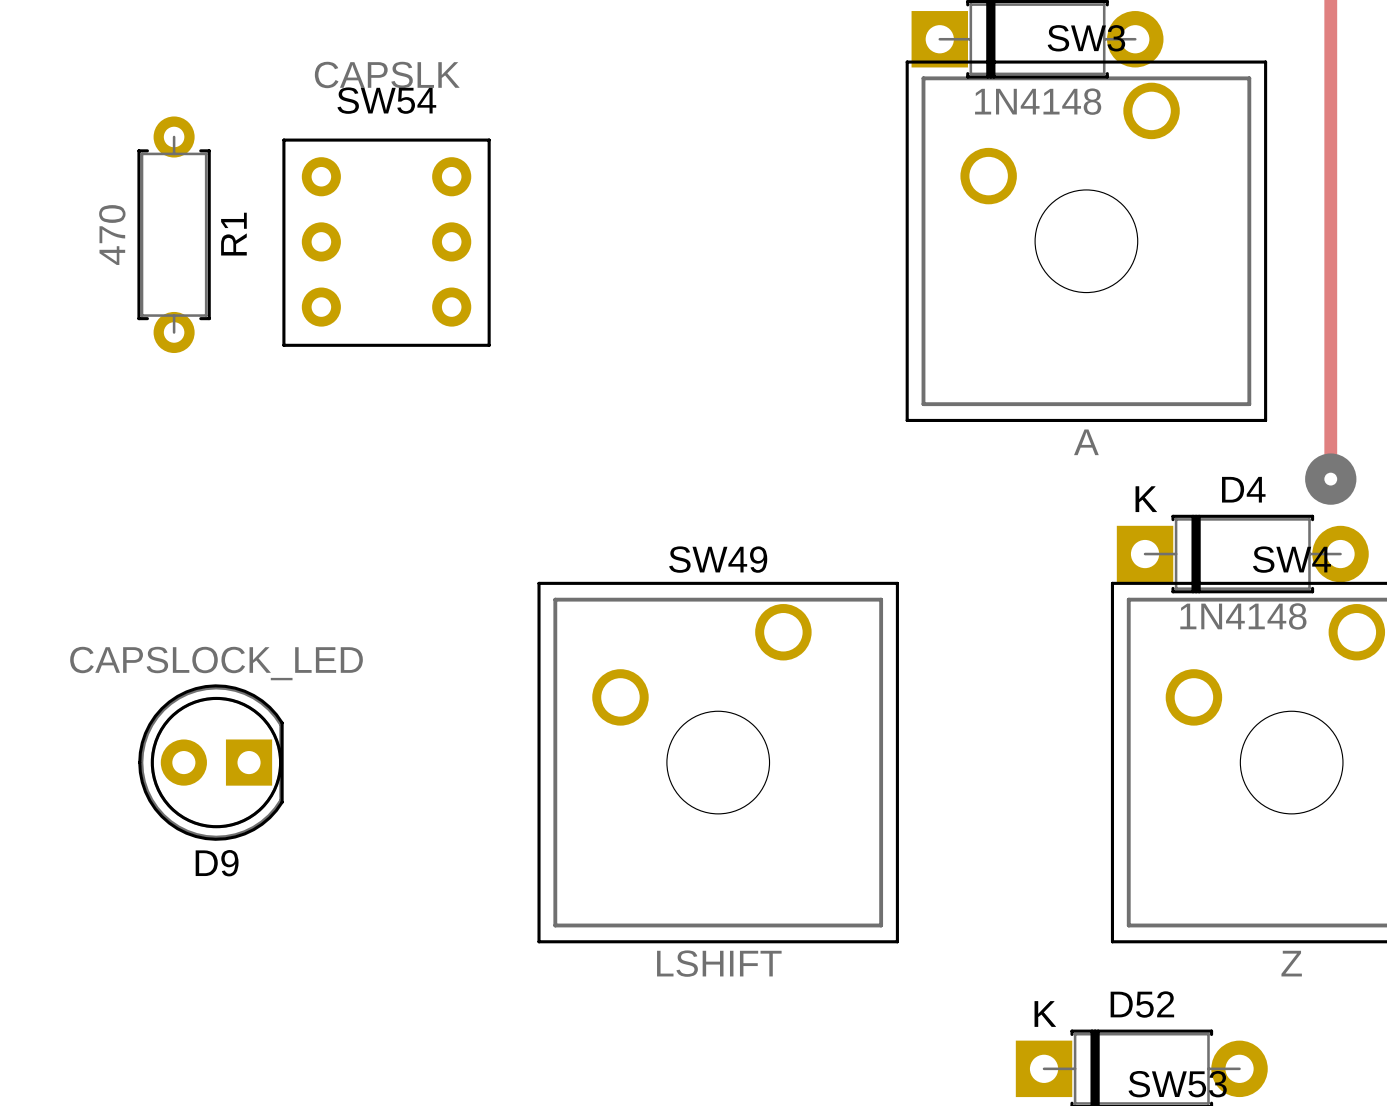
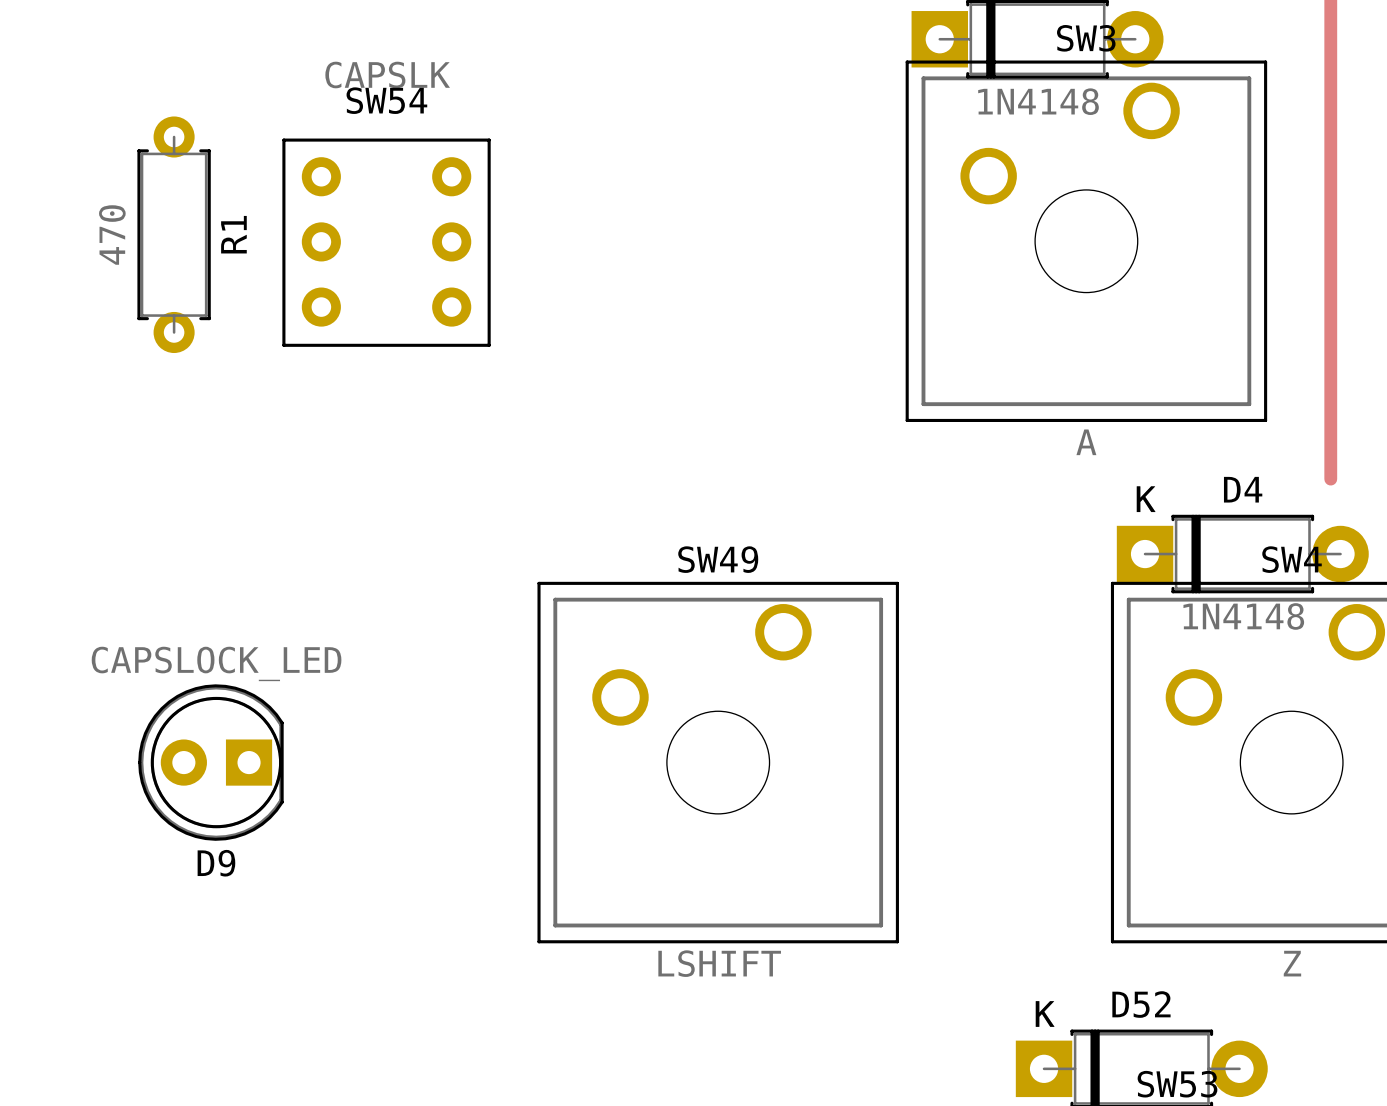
via: (1330, 479) -> none

